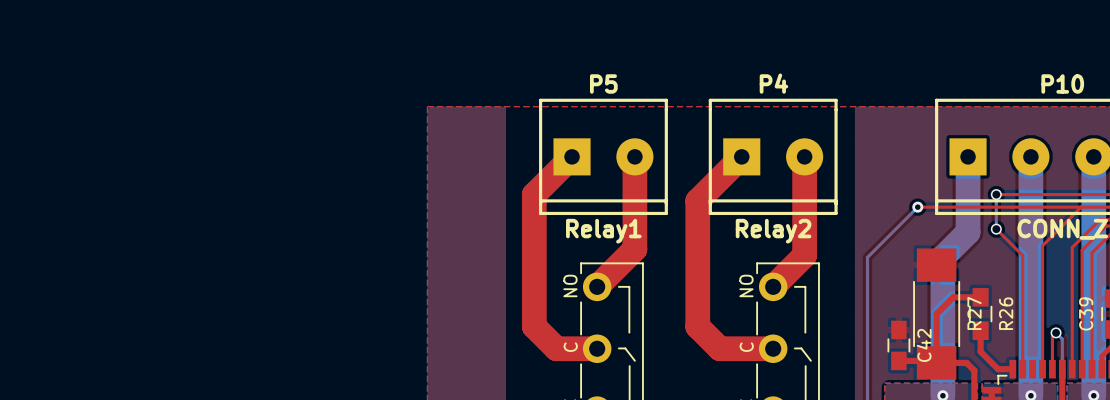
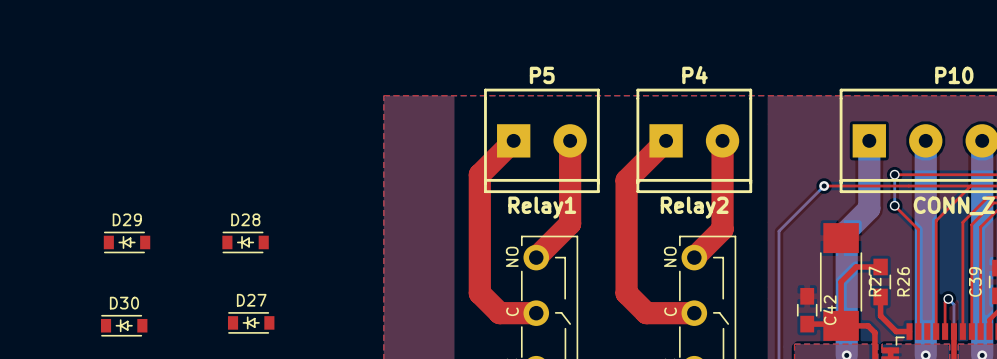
D29: none -> (127, 242)
D28: none -> (245, 242)
D27: none -> (251, 322)
D30: none -> (124, 325)

